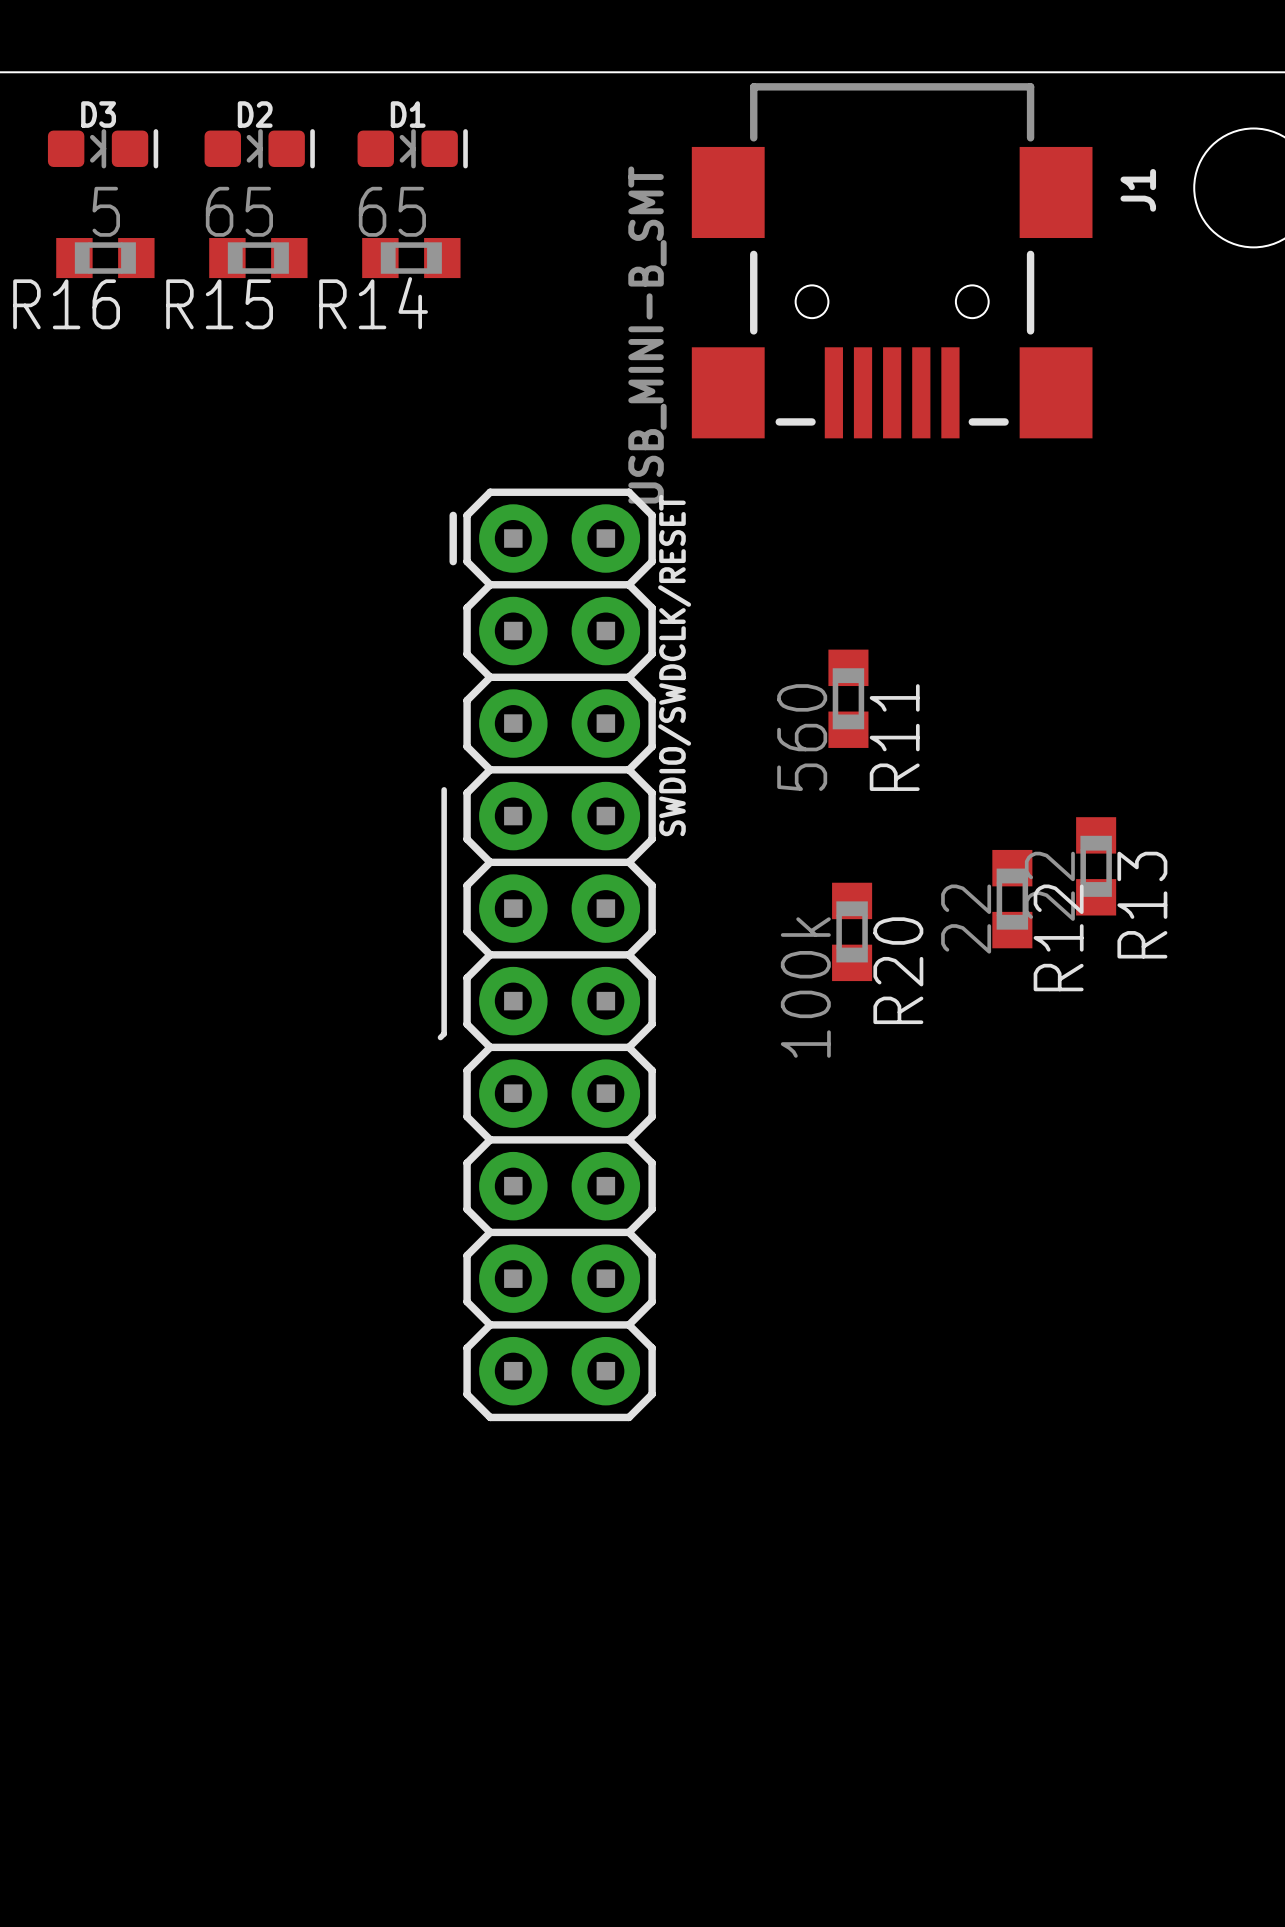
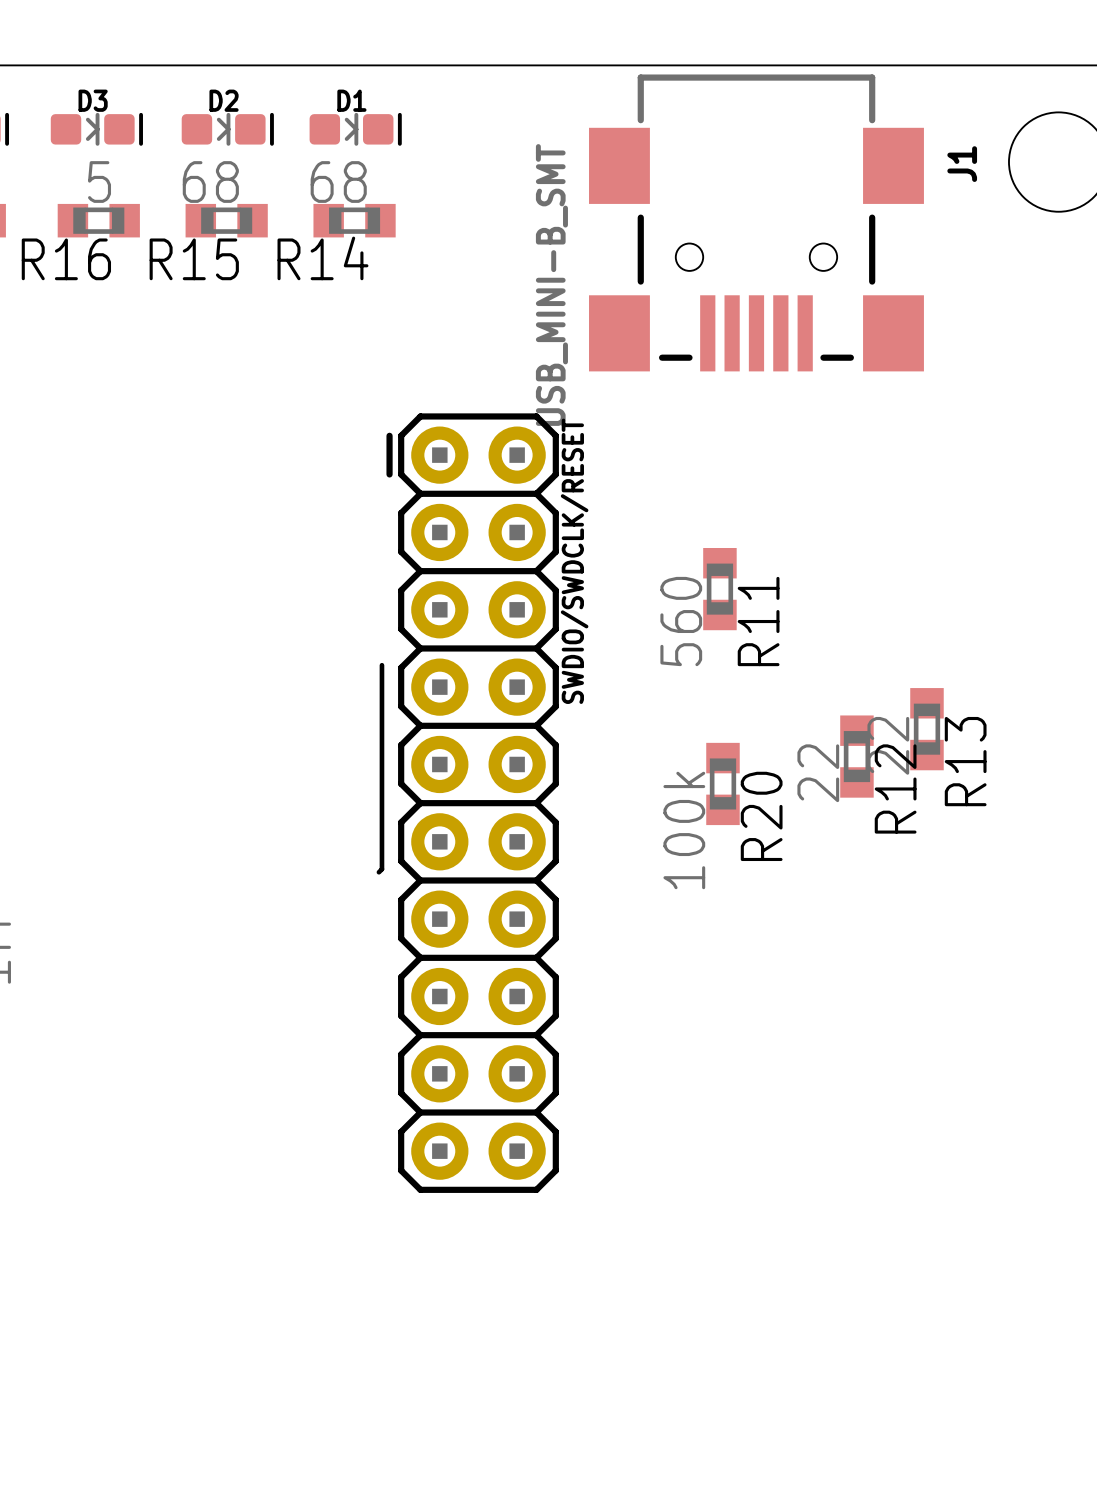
R15 value: 65 (239, 211) -> 68 (210, 182)
R14 value: 65 (392, 211) -> 68 (338, 182)

